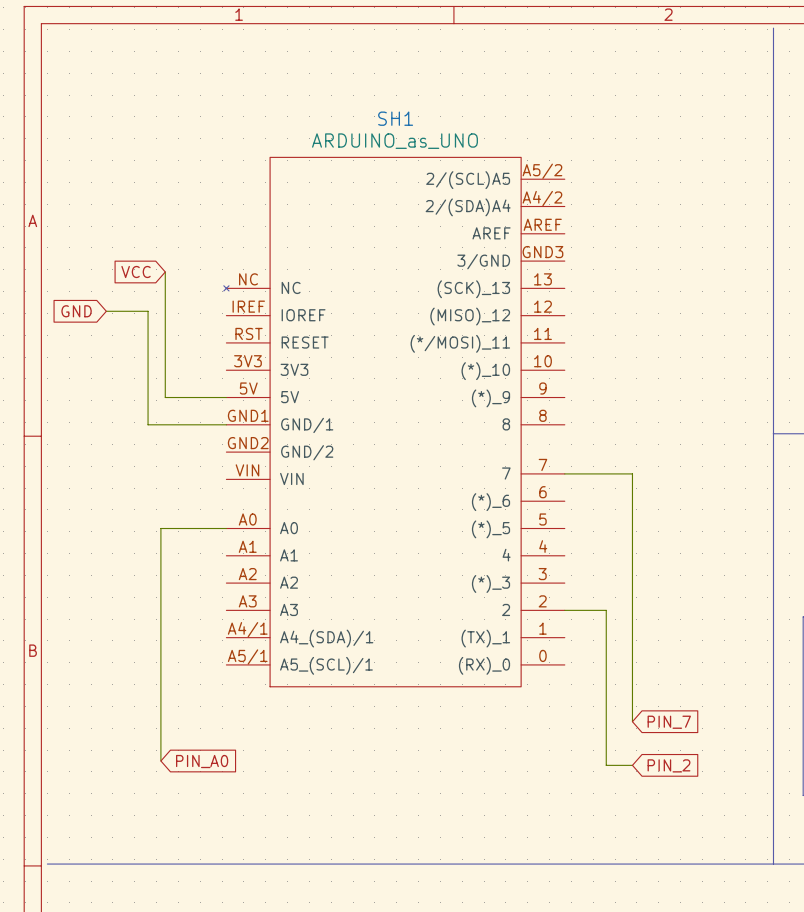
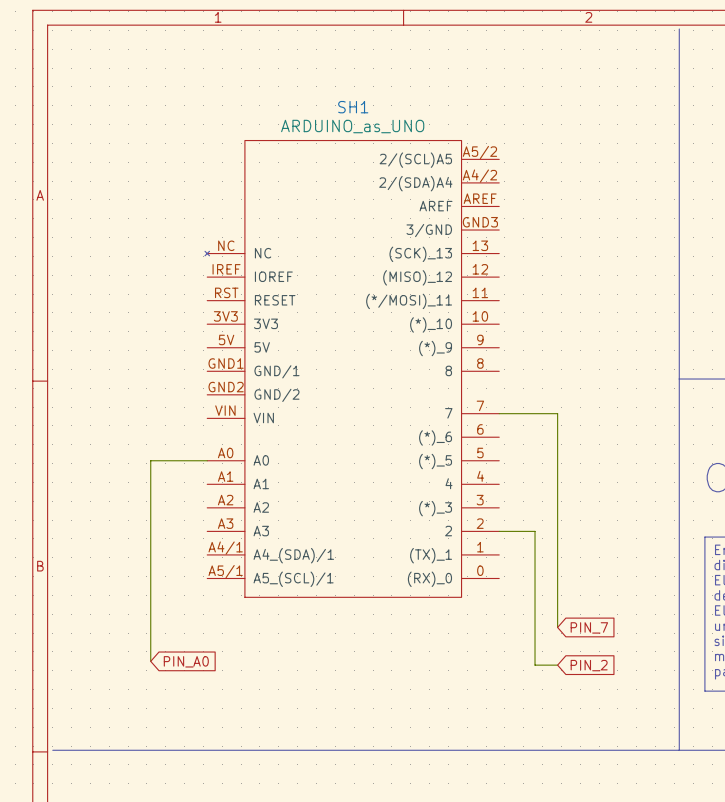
global label: VCC (136, 271) -> none
wire: (165, 271) (165, 397) (226, 397) -> none
global label: GND (76, 311) -> none
wire: (106, 311) (148, 311) (148, 424) (226, 424) -> none

